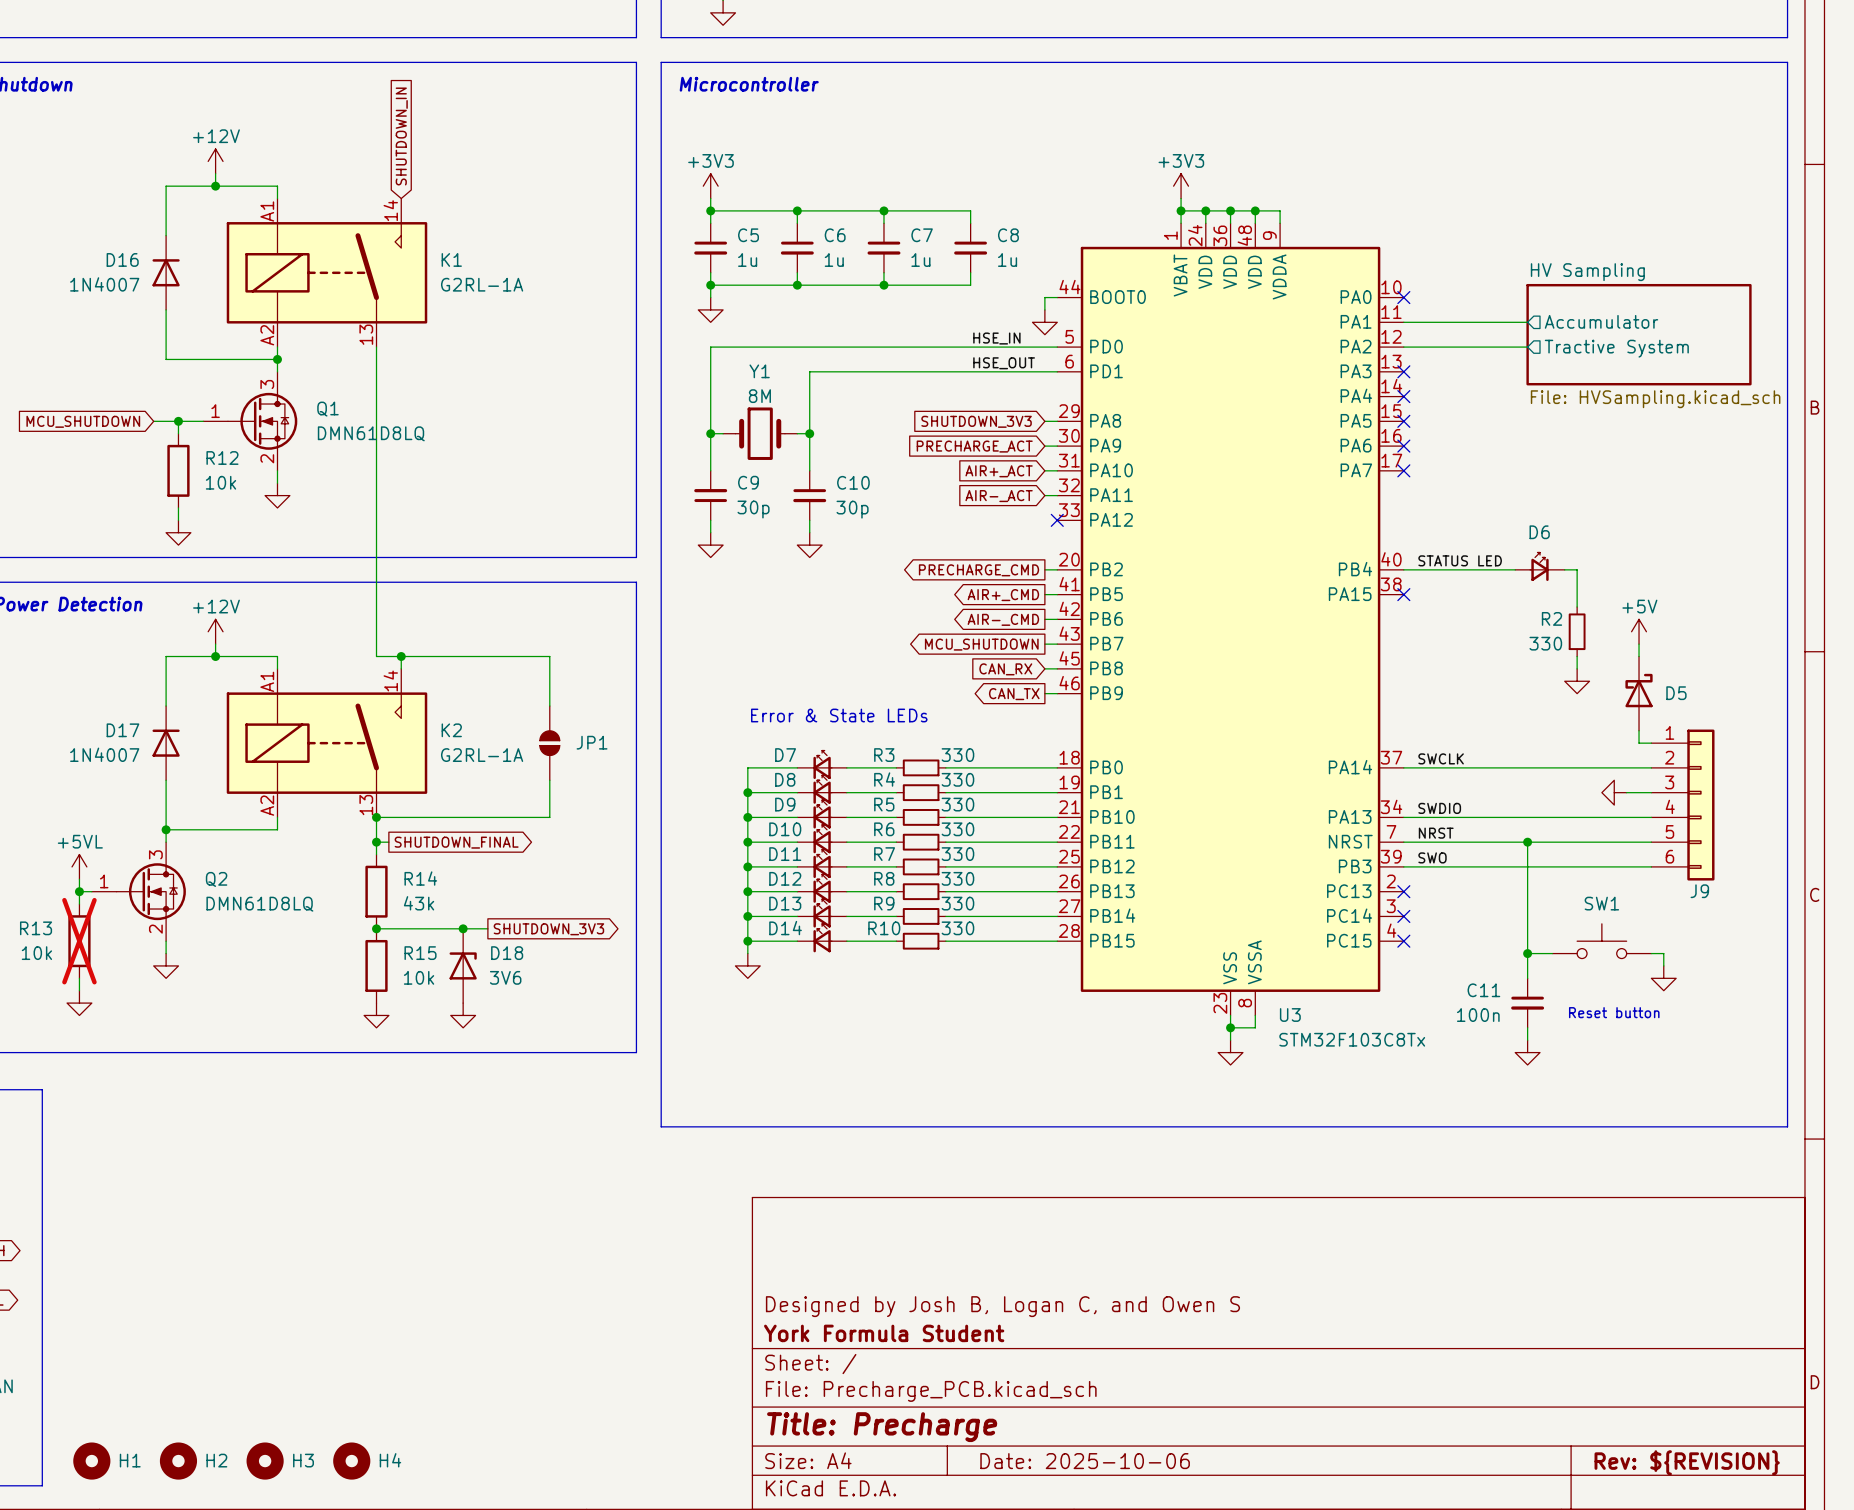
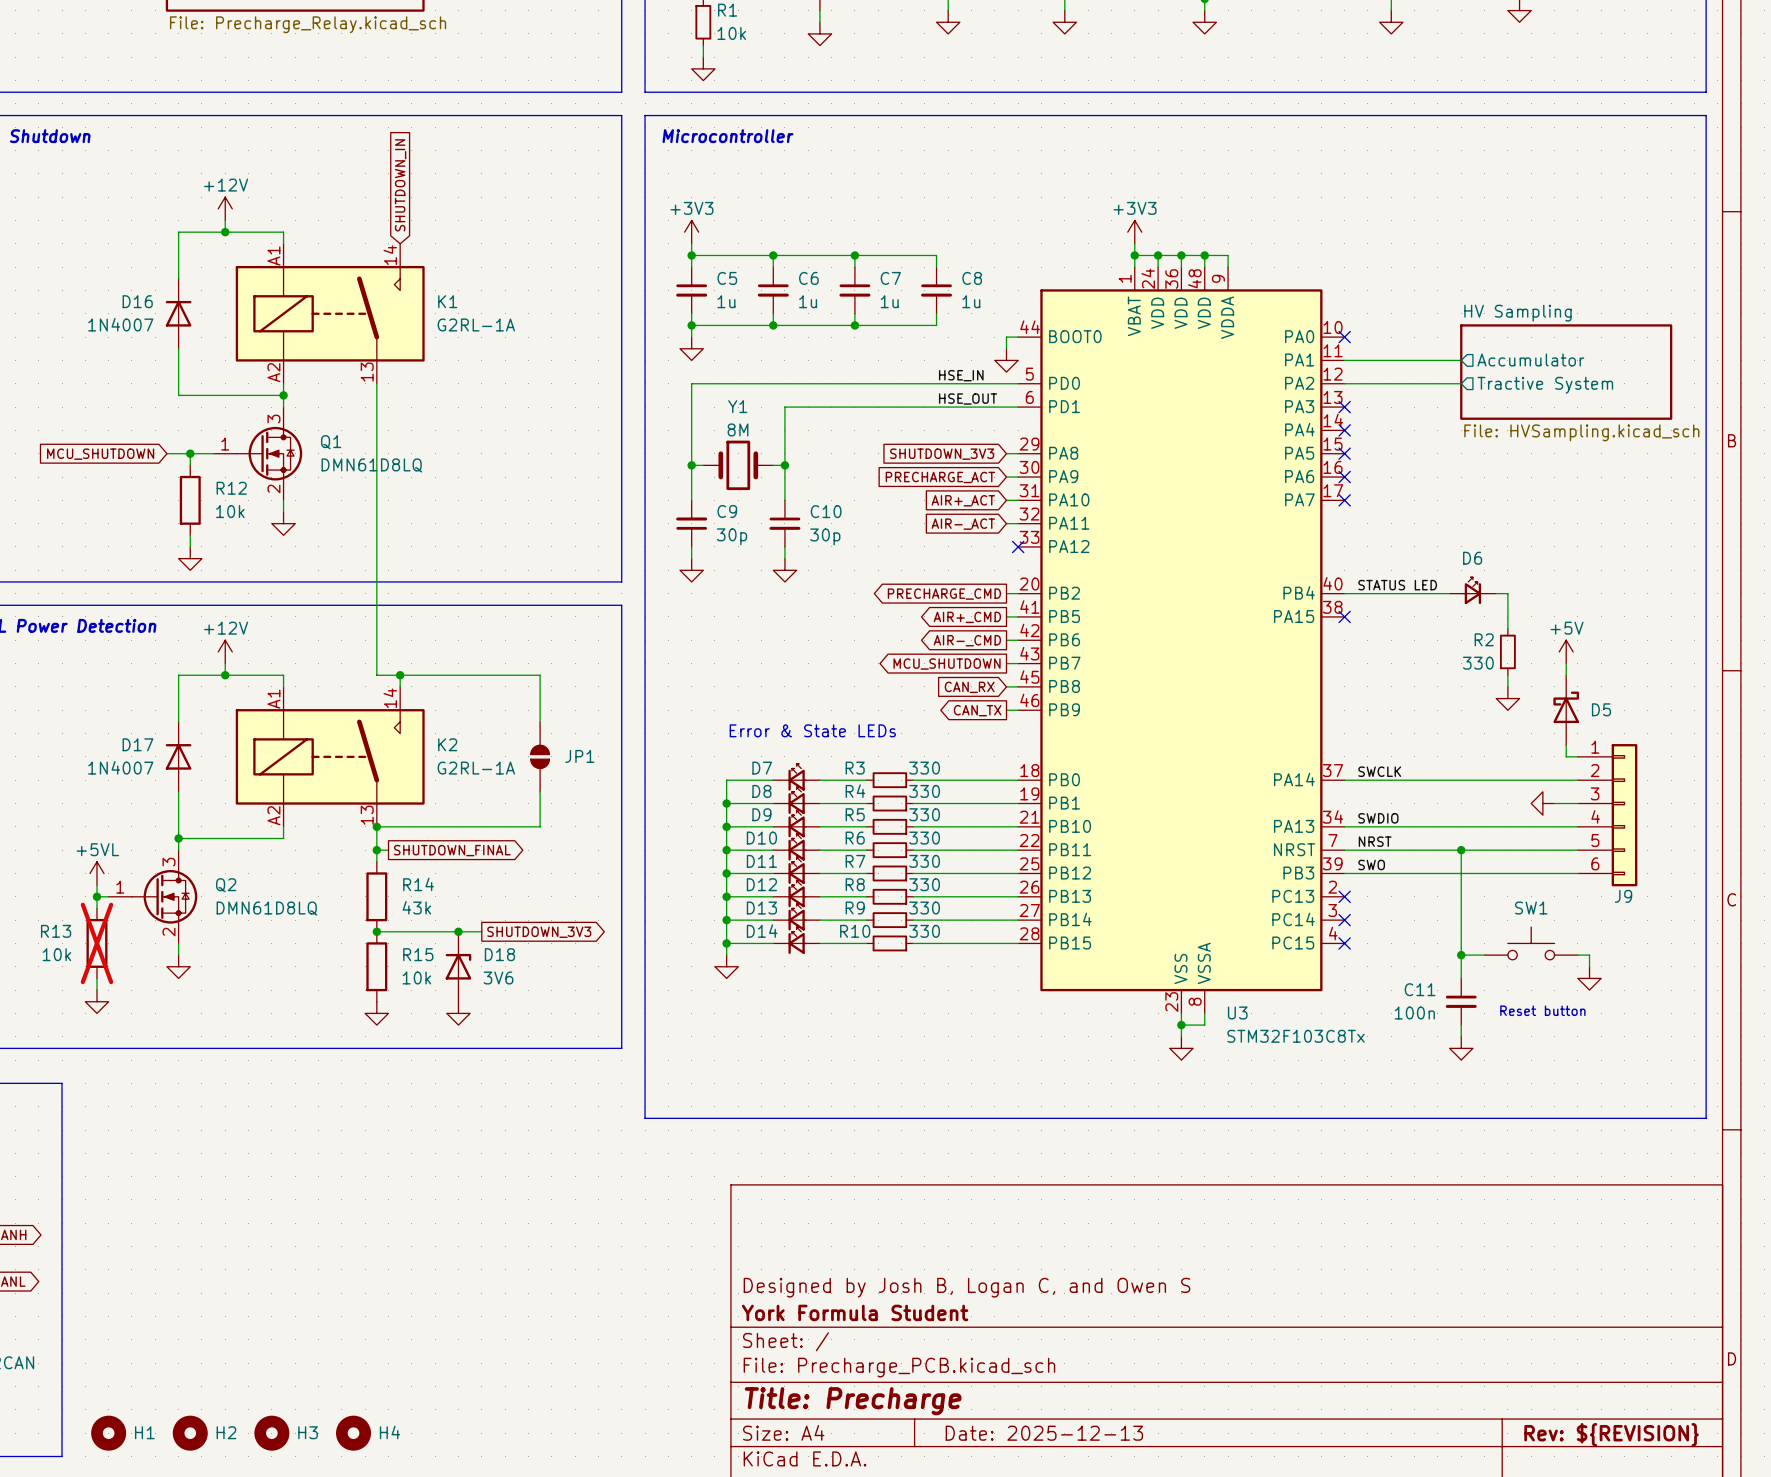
title block: Date: 2025-10-06 (1085, 1461) -> Date: 2025-12-13 (1044, 1433)

